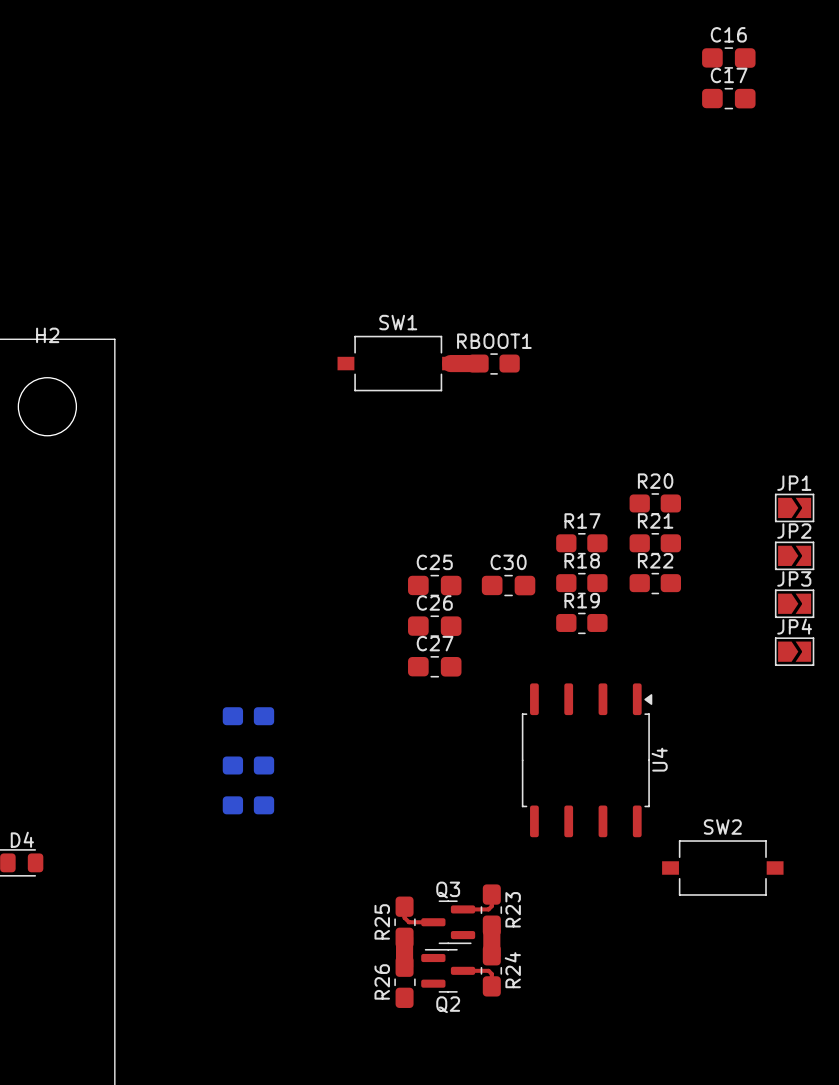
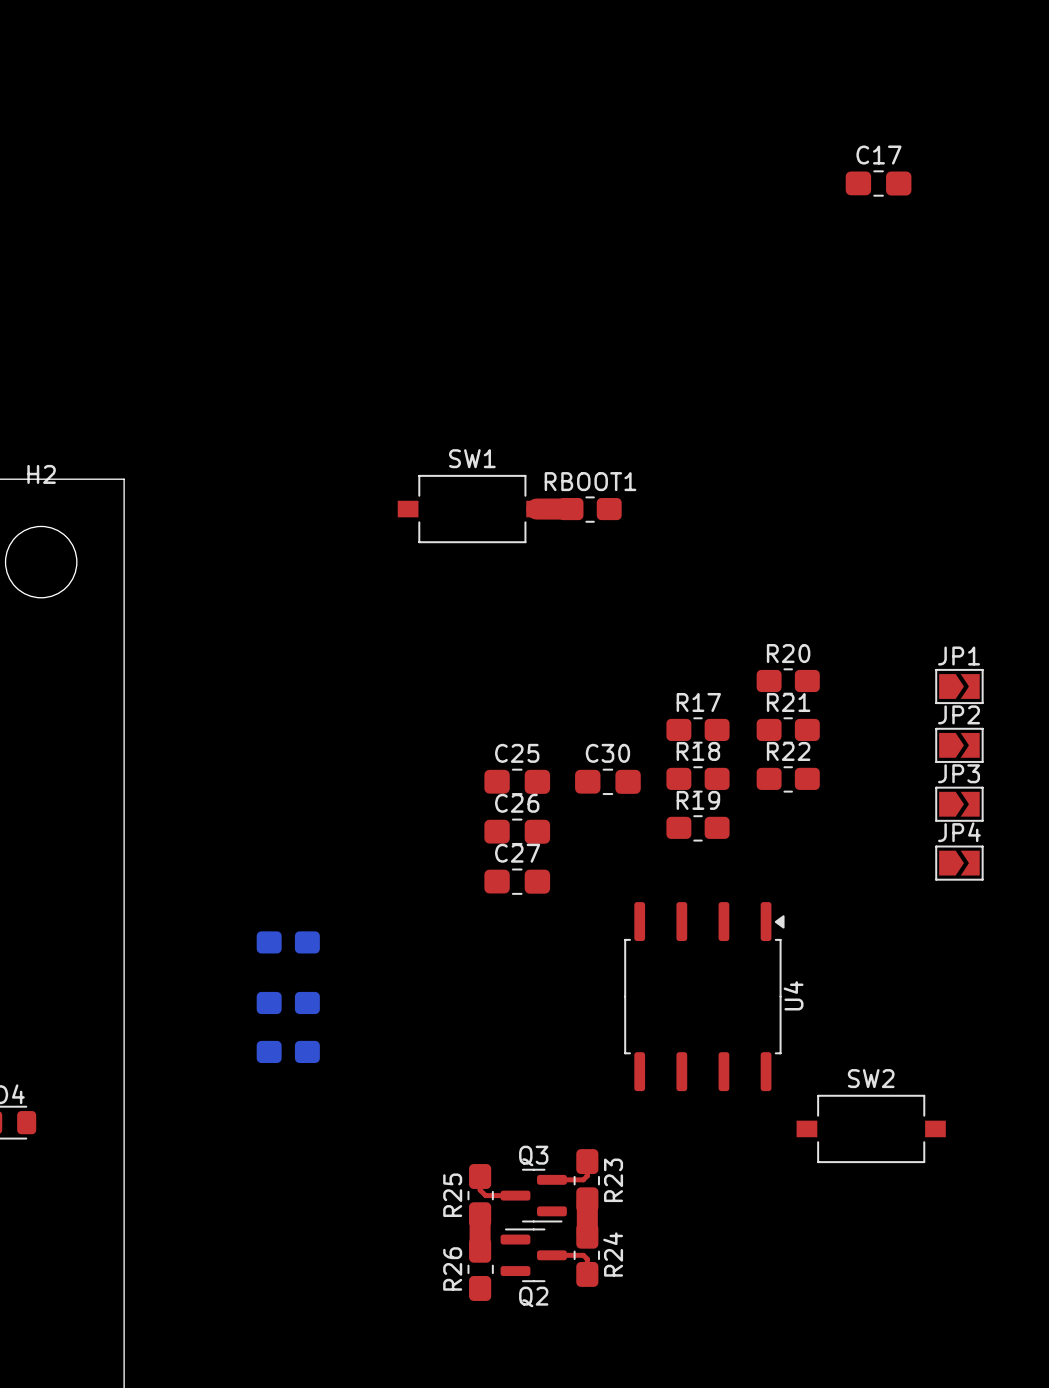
C16: (728, 58) -> none

